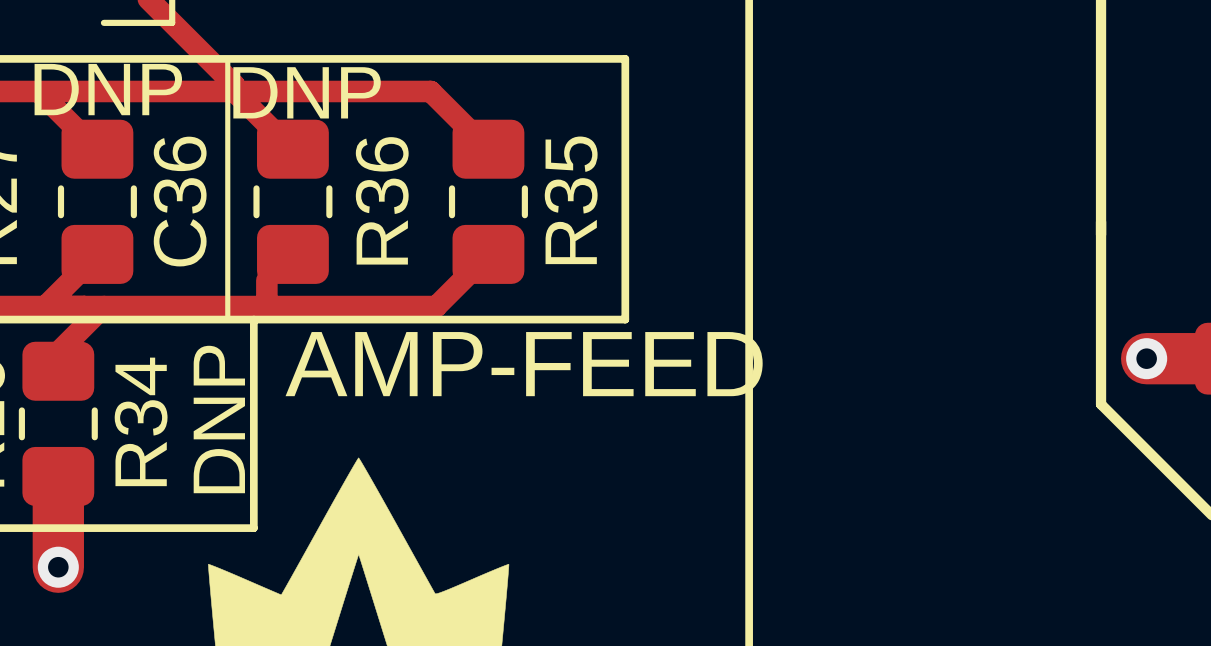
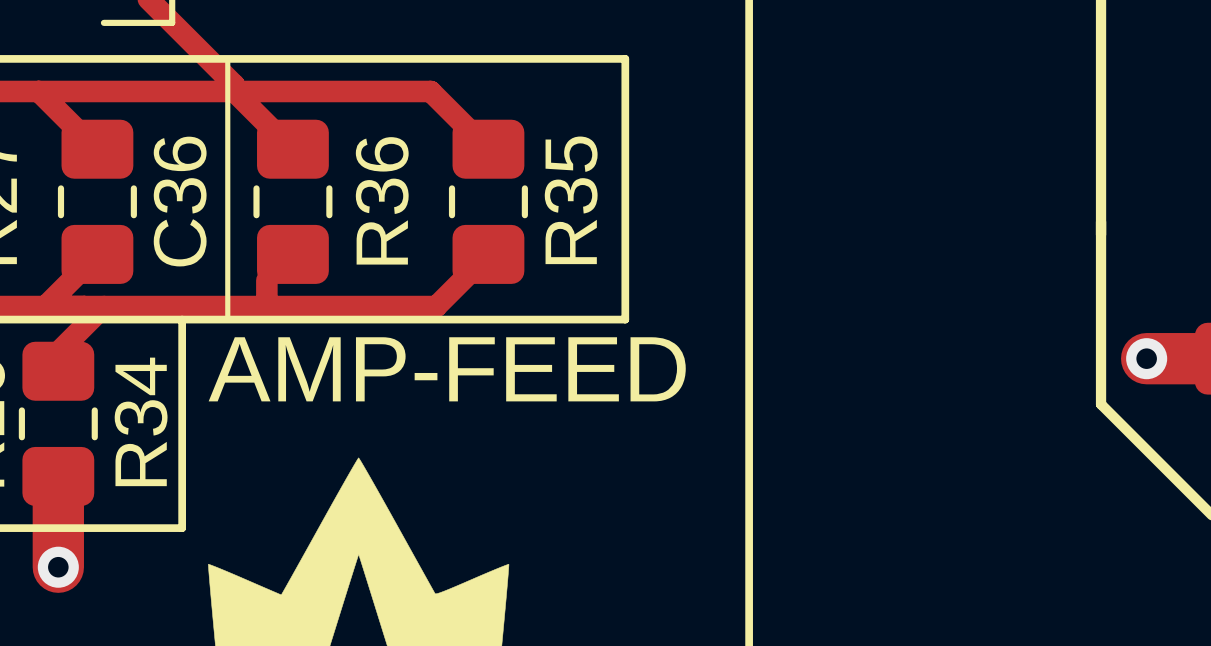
R36 value: DNP (108, 89) -> none
R35 value: DNP (307, 92) -> none
line: (253, 319) (253, 528) (182, 528) -> (182, 319) (182, 528)
text position: AMP-FEED (524, 364) -> AMP-FEED (447, 369)
R34 value: DNP (219, 419) -> none

